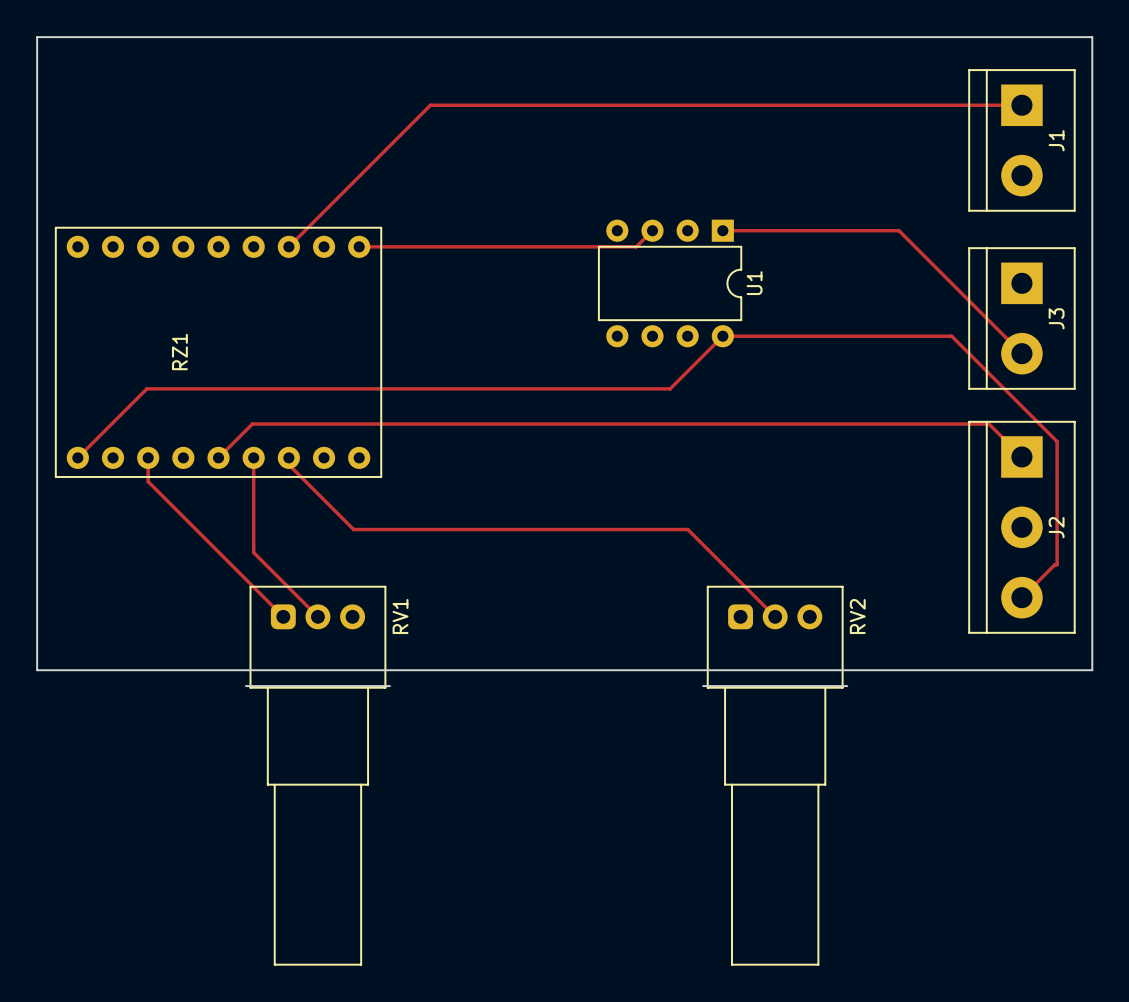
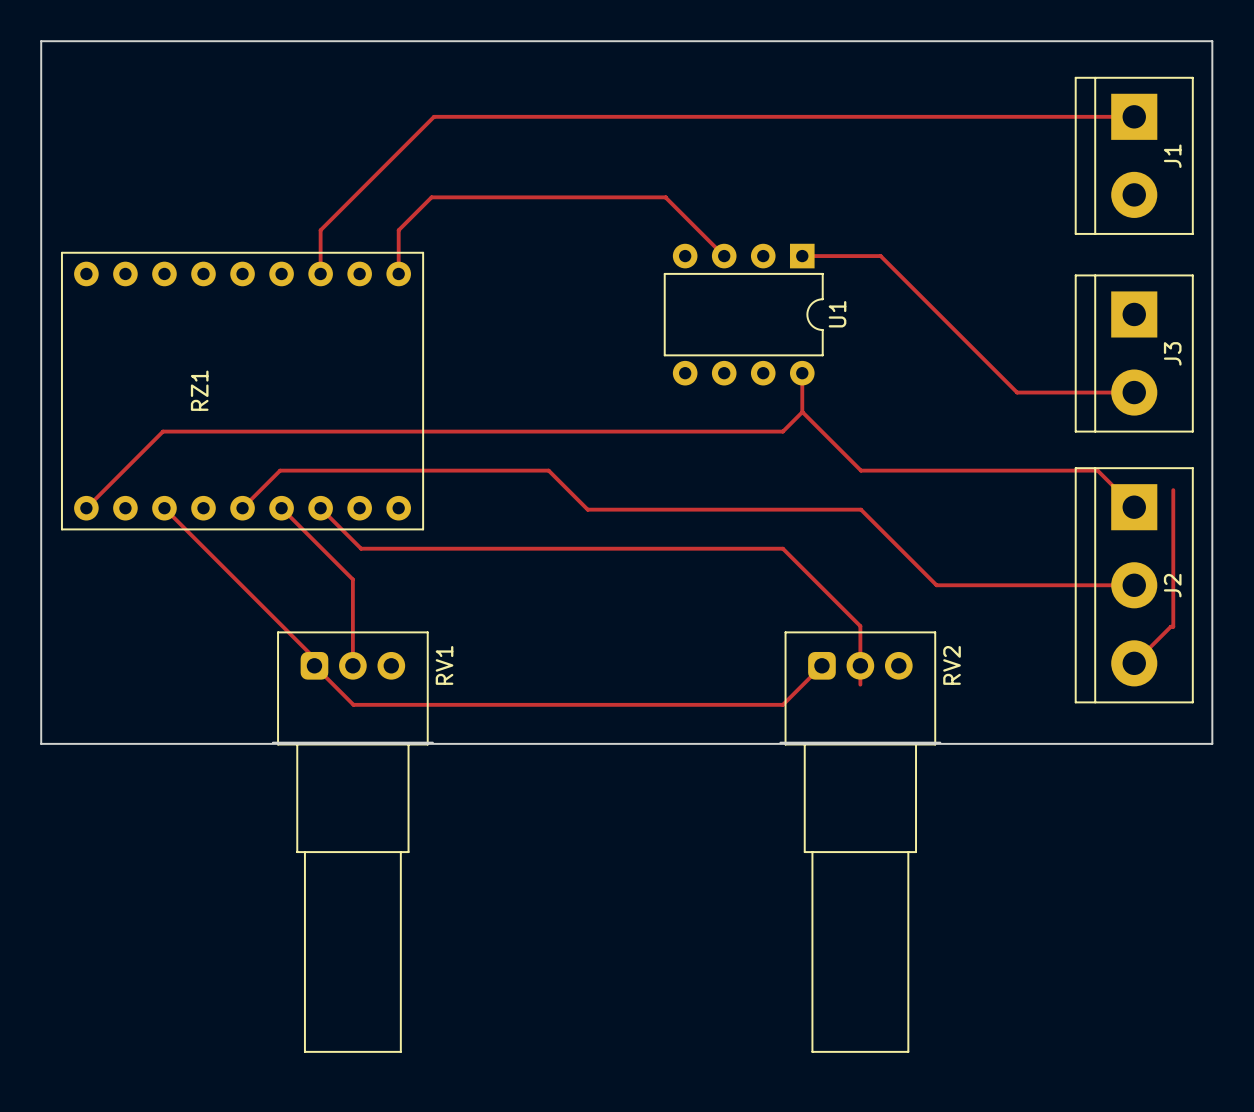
track: (430, 105) (288, 246) -> (477, 116) (434, 116) (320, 230) (320, 273)
track: (652, 230) (636, 246) (359, 246) -> (724, 256) (665, 197) (431, 197) (398, 230) (398, 273)
track: (793, 230) (898, 230) (1021, 353) -> (880, 256) (1017, 392) (1134, 392)
track: (670, 388) (722, 336) (951, 336) (1057, 441) -> (743, 431) (782, 431) (802, 412) (802, 373)
track: (494, 424) (775, 424) -> (802, 412) (860, 470)
track: none -> (548, 470) (587, 509) (860, 509) (936, 585) (1134, 585)
track: (148, 457) (148, 481) (283, 616) -> (164, 508) (314, 658) (314, 665) (353, 704) (782, 704) (821, 665)
track: (253, 457) (253, 552) (317, 616) -> (281, 508) (352, 579) (352, 665)
track: (283, 459) (353, 529) (687, 529) (775, 616) -> (320, 508) (361, 548) (782, 548) (860, 626) (860, 684)
RV1 position: (317, 775) -> (352, 842)
RV2 position: (775, 775) -> (860, 842)

